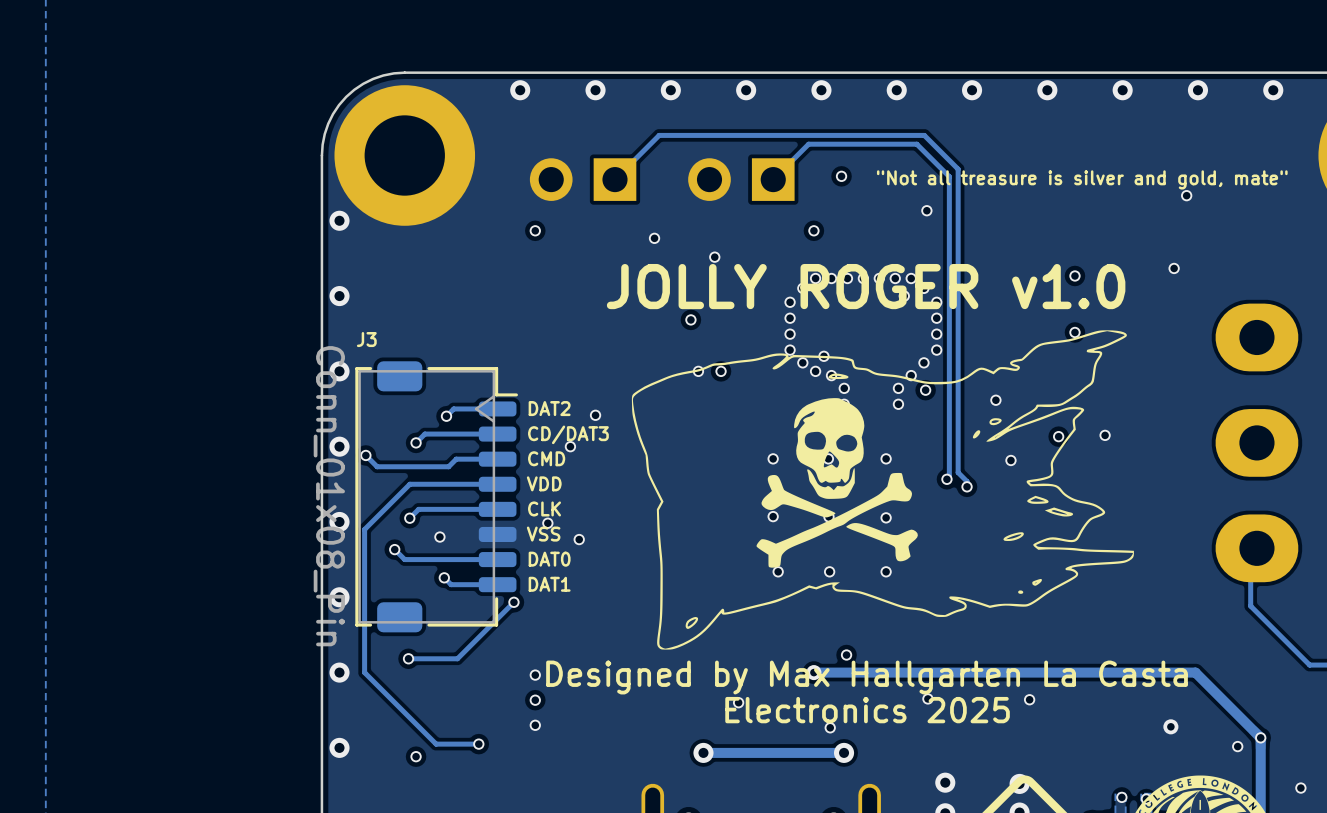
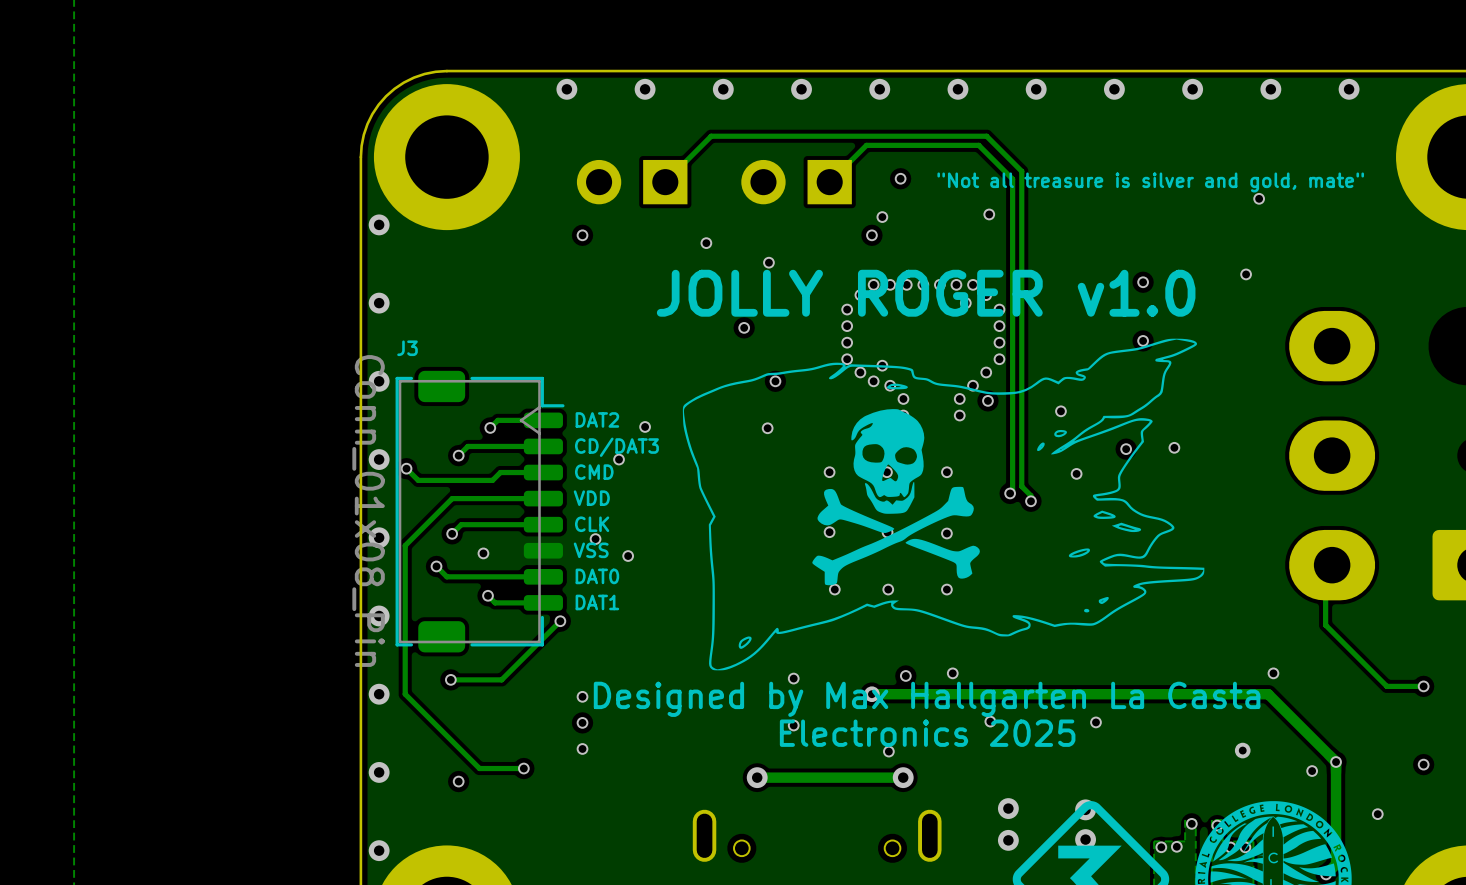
via: none -> (882, 217)
via position: (698, 371) -> (767, 428)
via: none -> (952, 673)
via: none -> (1273, 673)
via: none -> (793, 678)

